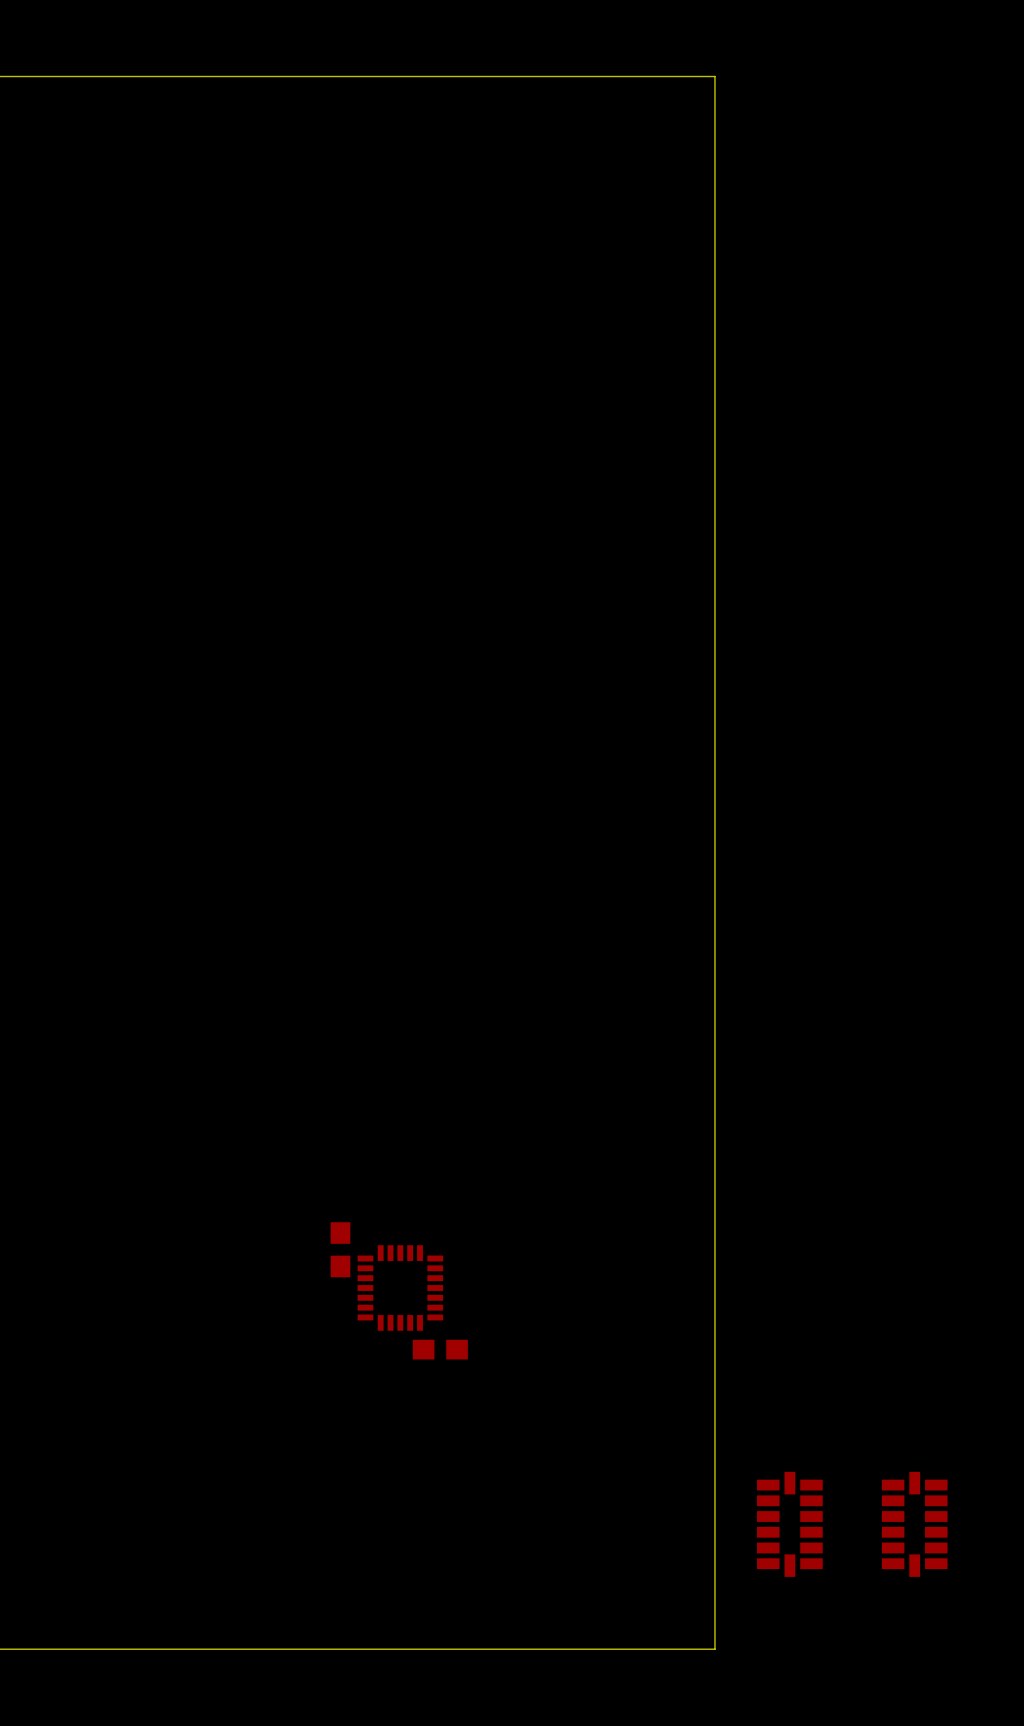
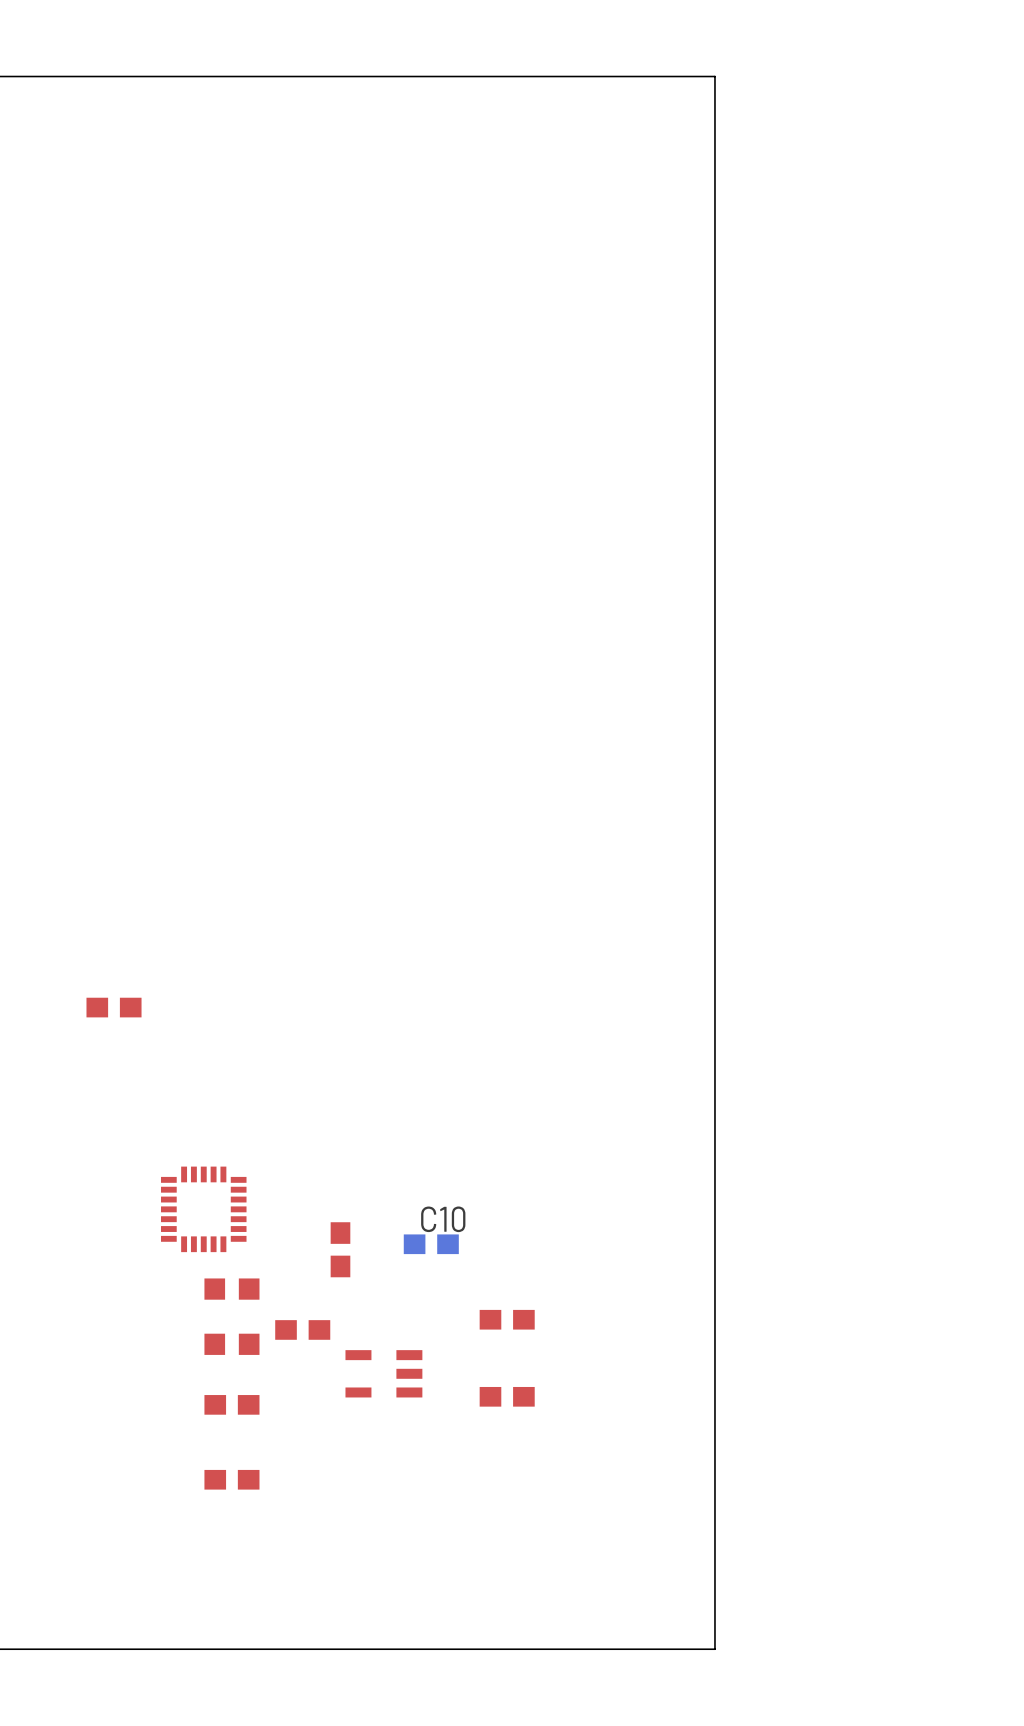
part: none -> (114, 1007)
C10: none -> (431, 1244)
part position: (400, 1287) -> (203, 1209)
part: none -> (231, 1289)
part: none -> (507, 1319)
part: none -> (302, 1329)
part: none -> (231, 1344)
part: (440, 1349) -> none
part: none -> (383, 1373)
part: none -> (507, 1396)
part: none -> (231, 1404)
part: none -> (231, 1479)
part: (789, 1524) -> none
part: (914, 1524) -> none

